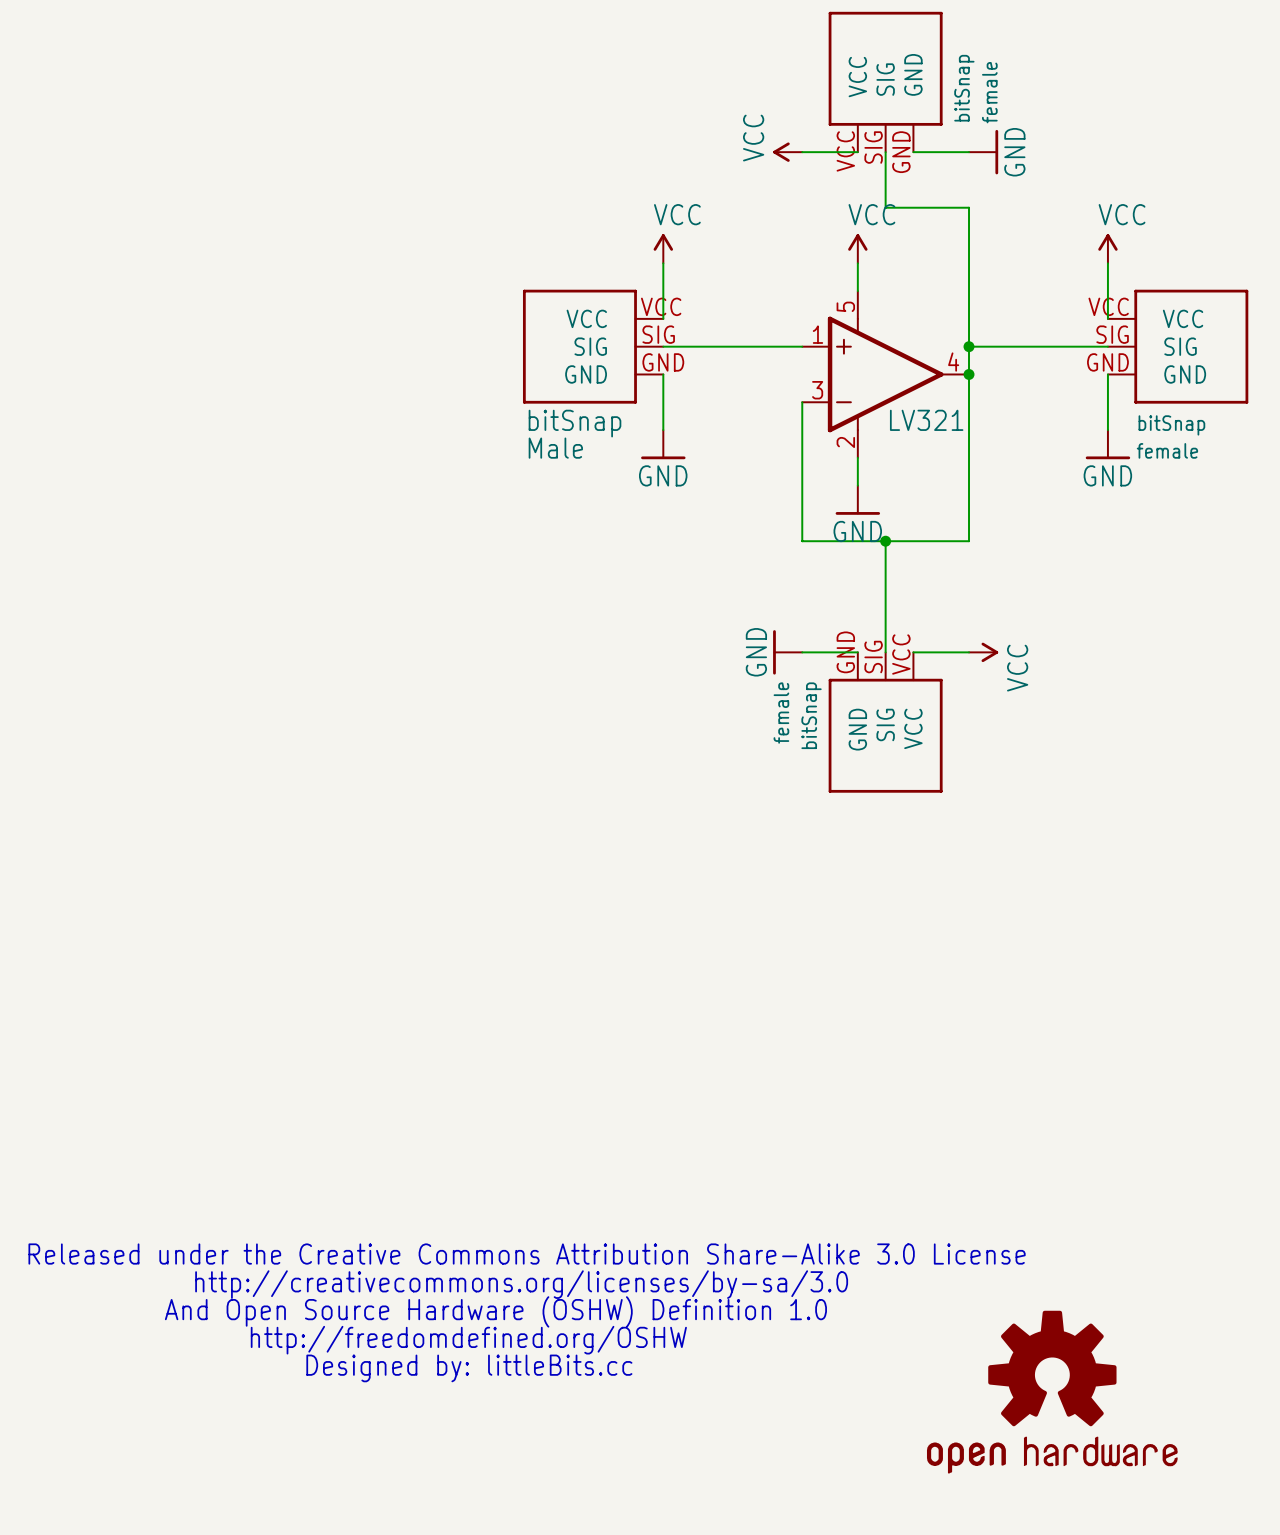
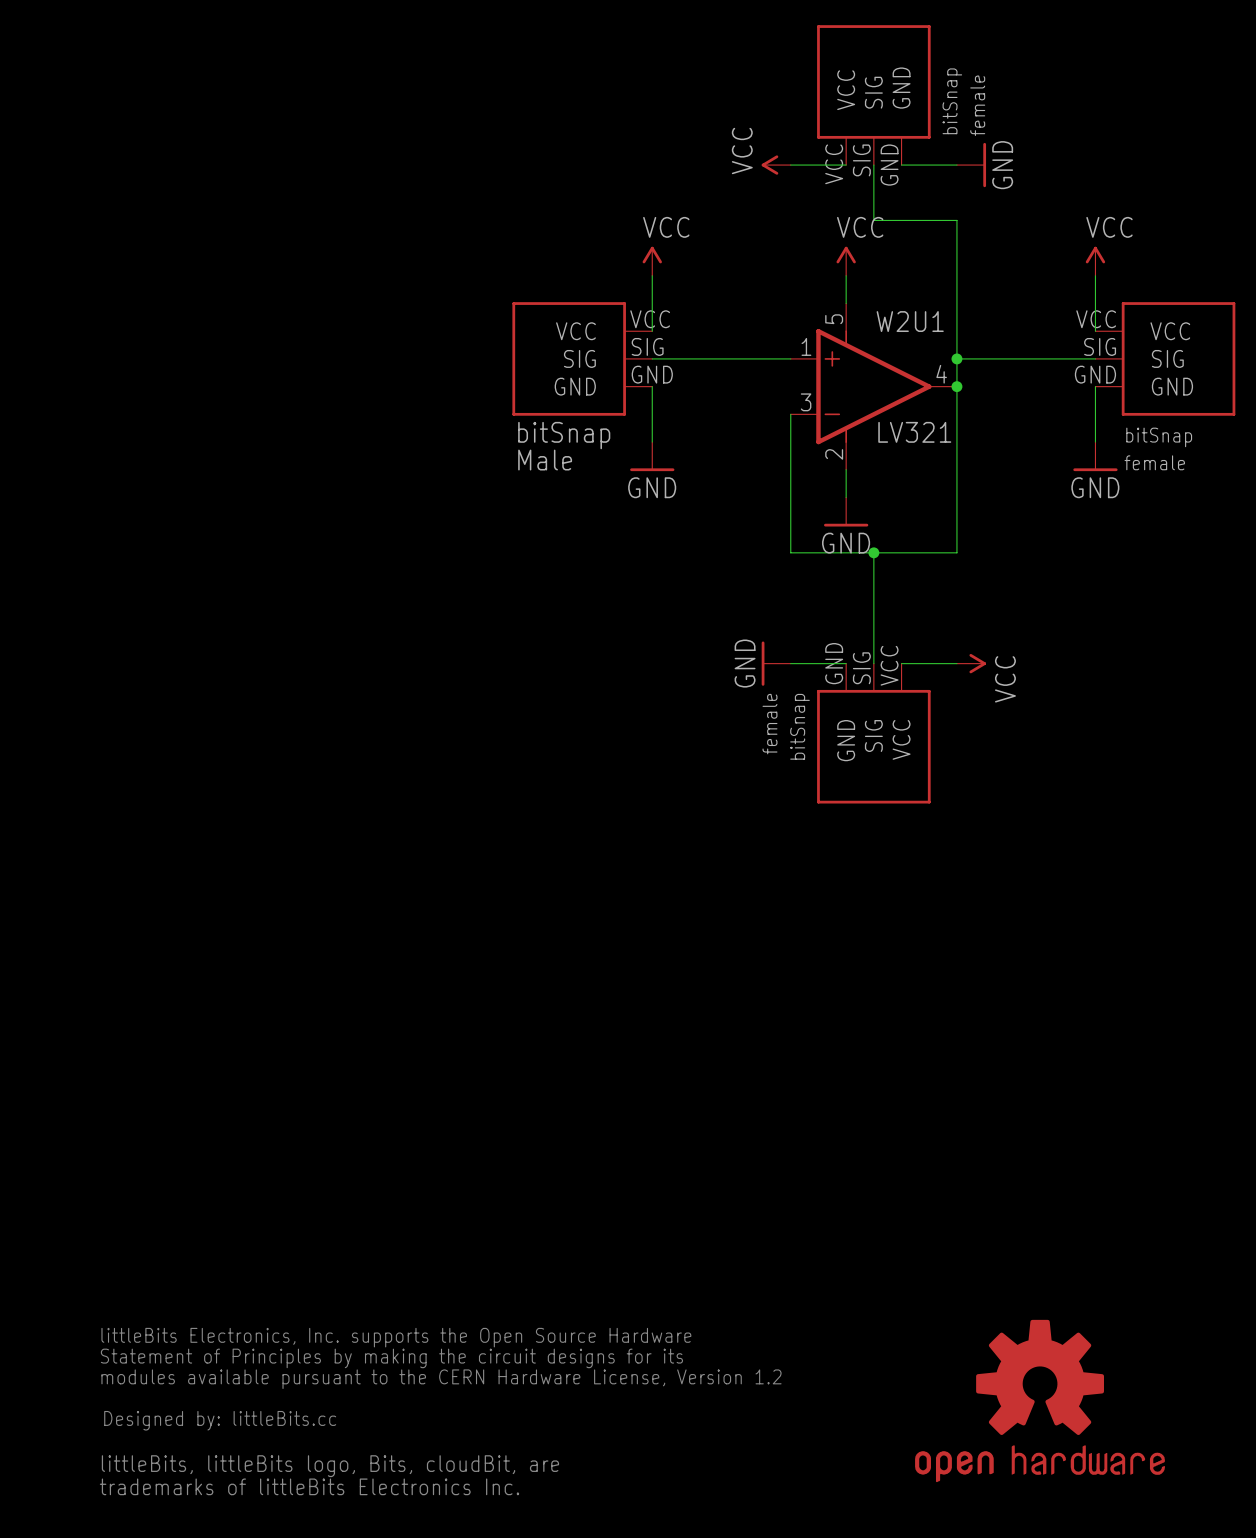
W2U1 name: none -> W2U1 (910, 321)
part: (527, 1312) -> none
part: none -> (440, 1411)

